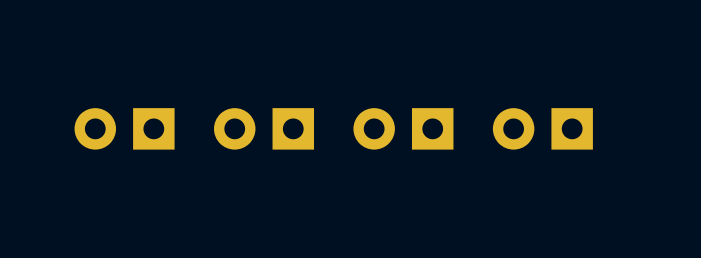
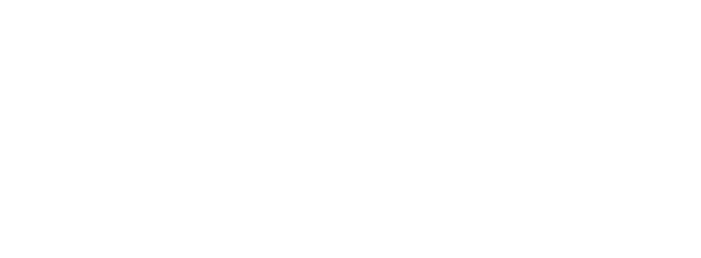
part: (124, 128) -> none
part: (264, 128) -> none
part: (403, 128) -> none
part: (542, 128) -> none

